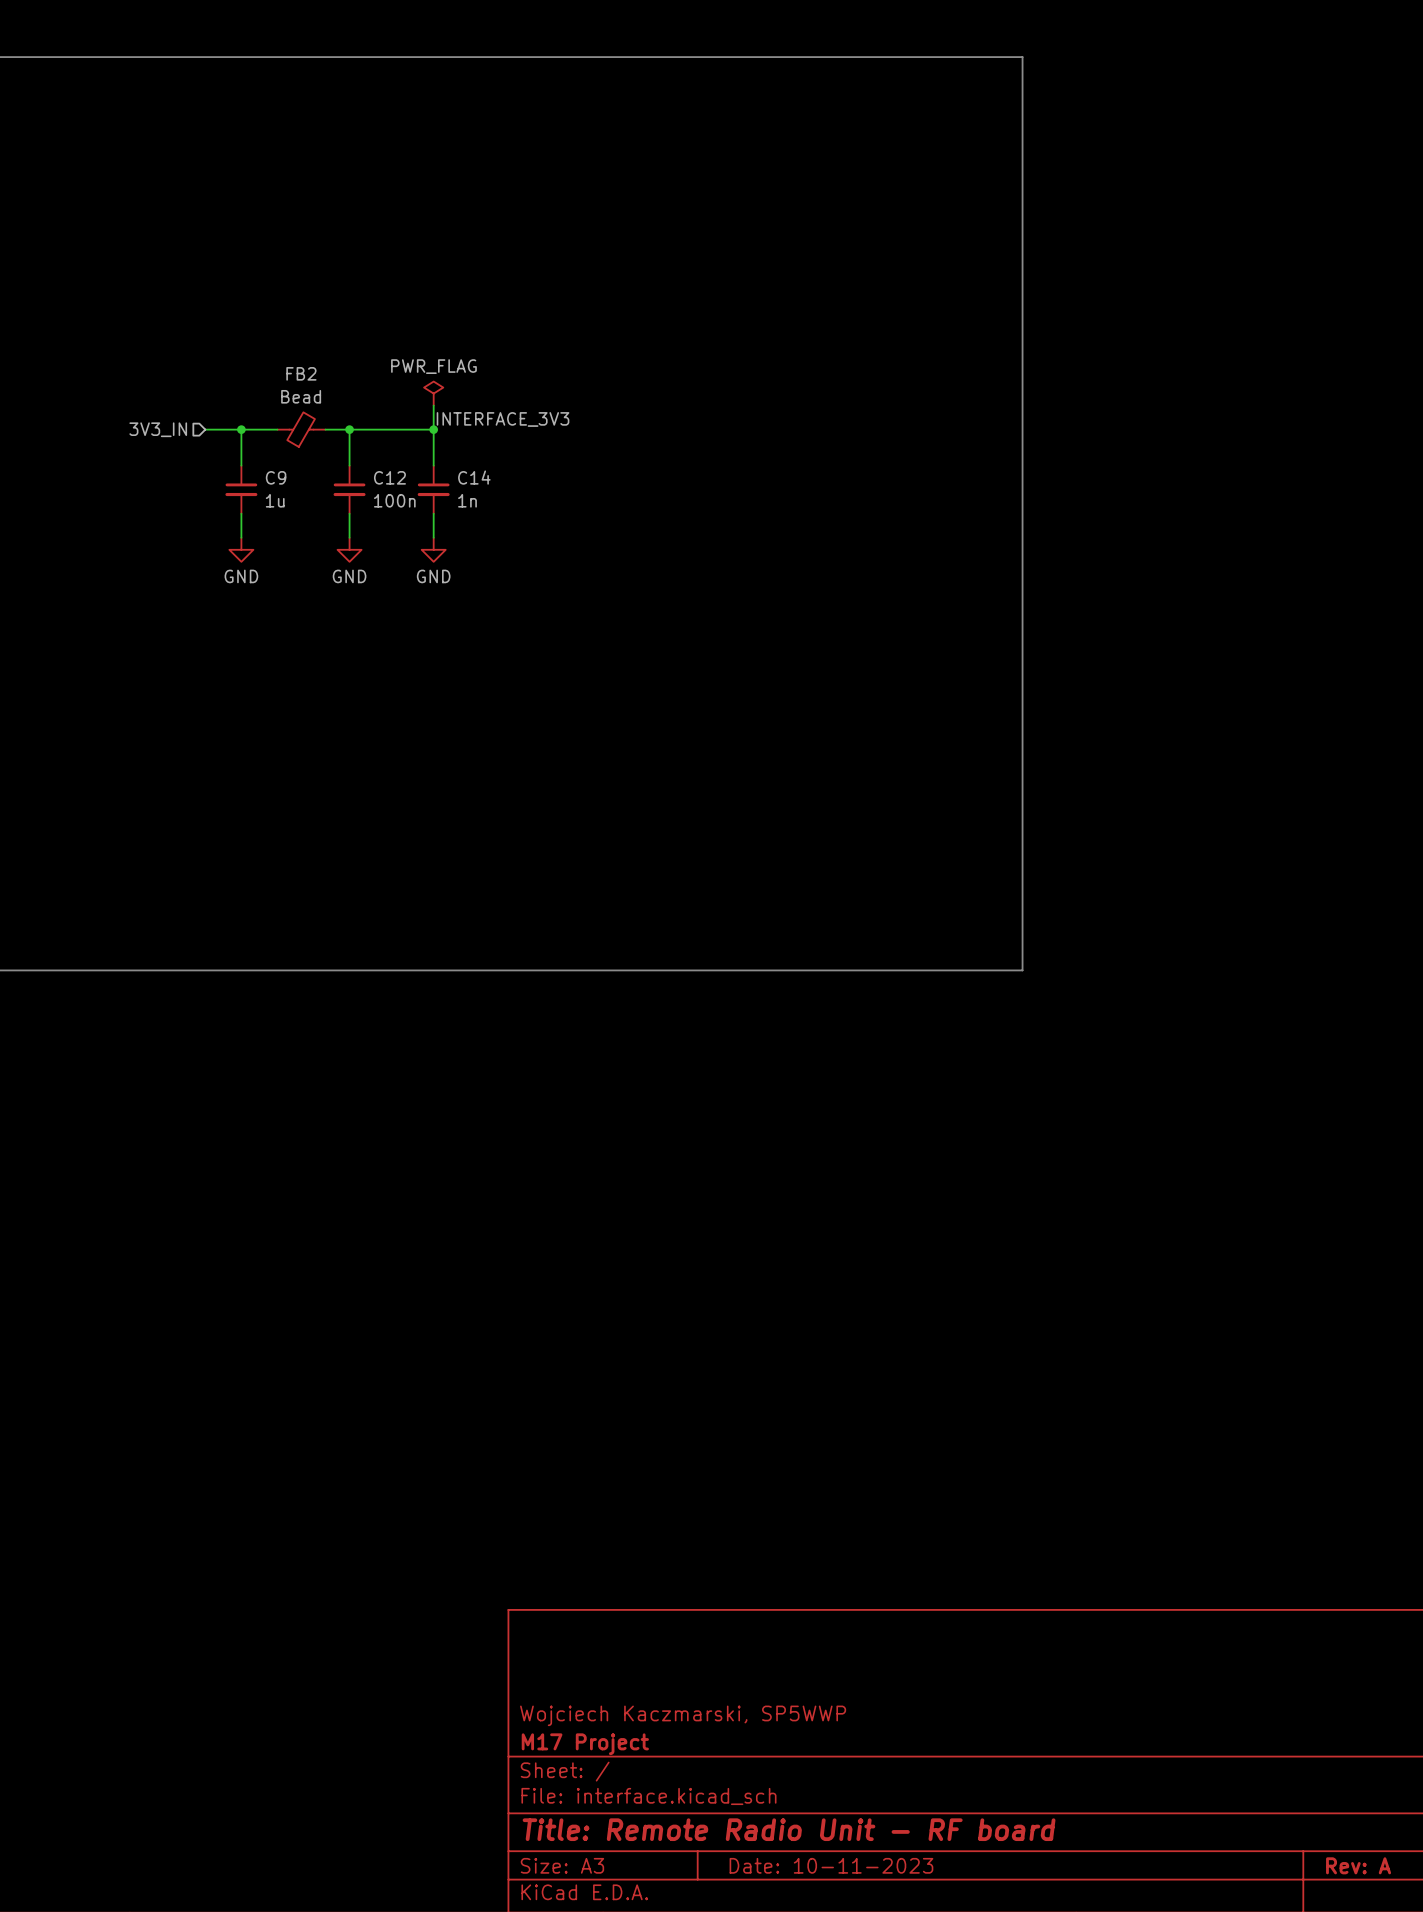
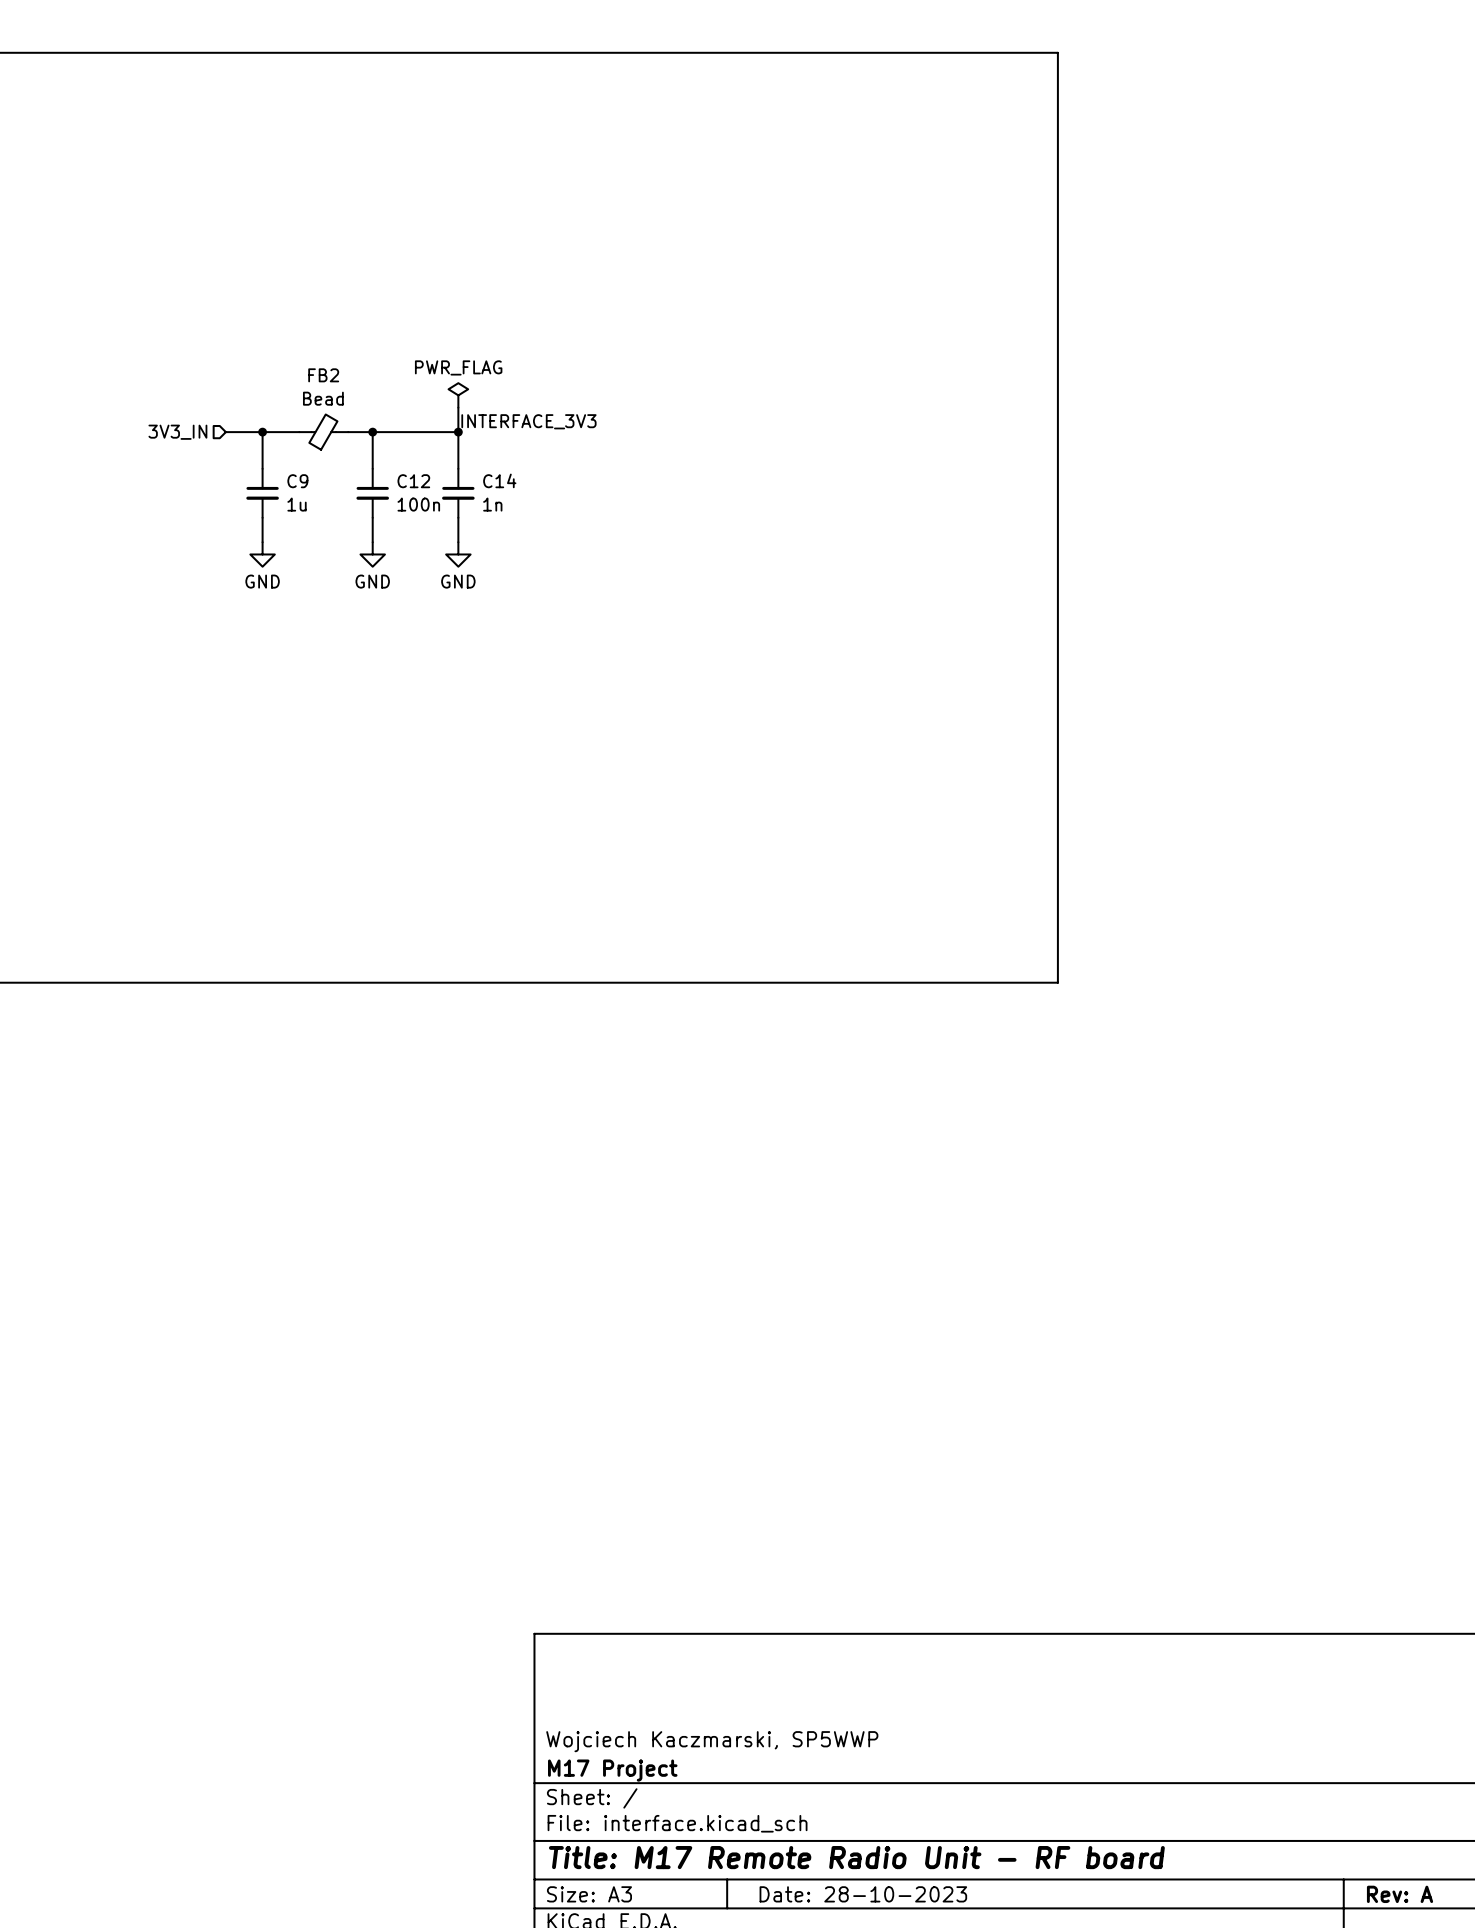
title block: Title: Remote Radio Unit - RF board (789, 1829) -> Title: M17 Remote Radio Unit - RF board (856, 1857)
title block: Date: 10-11-2023 (831, 1865) -> Date: 28-10-2023 (863, 1894)

